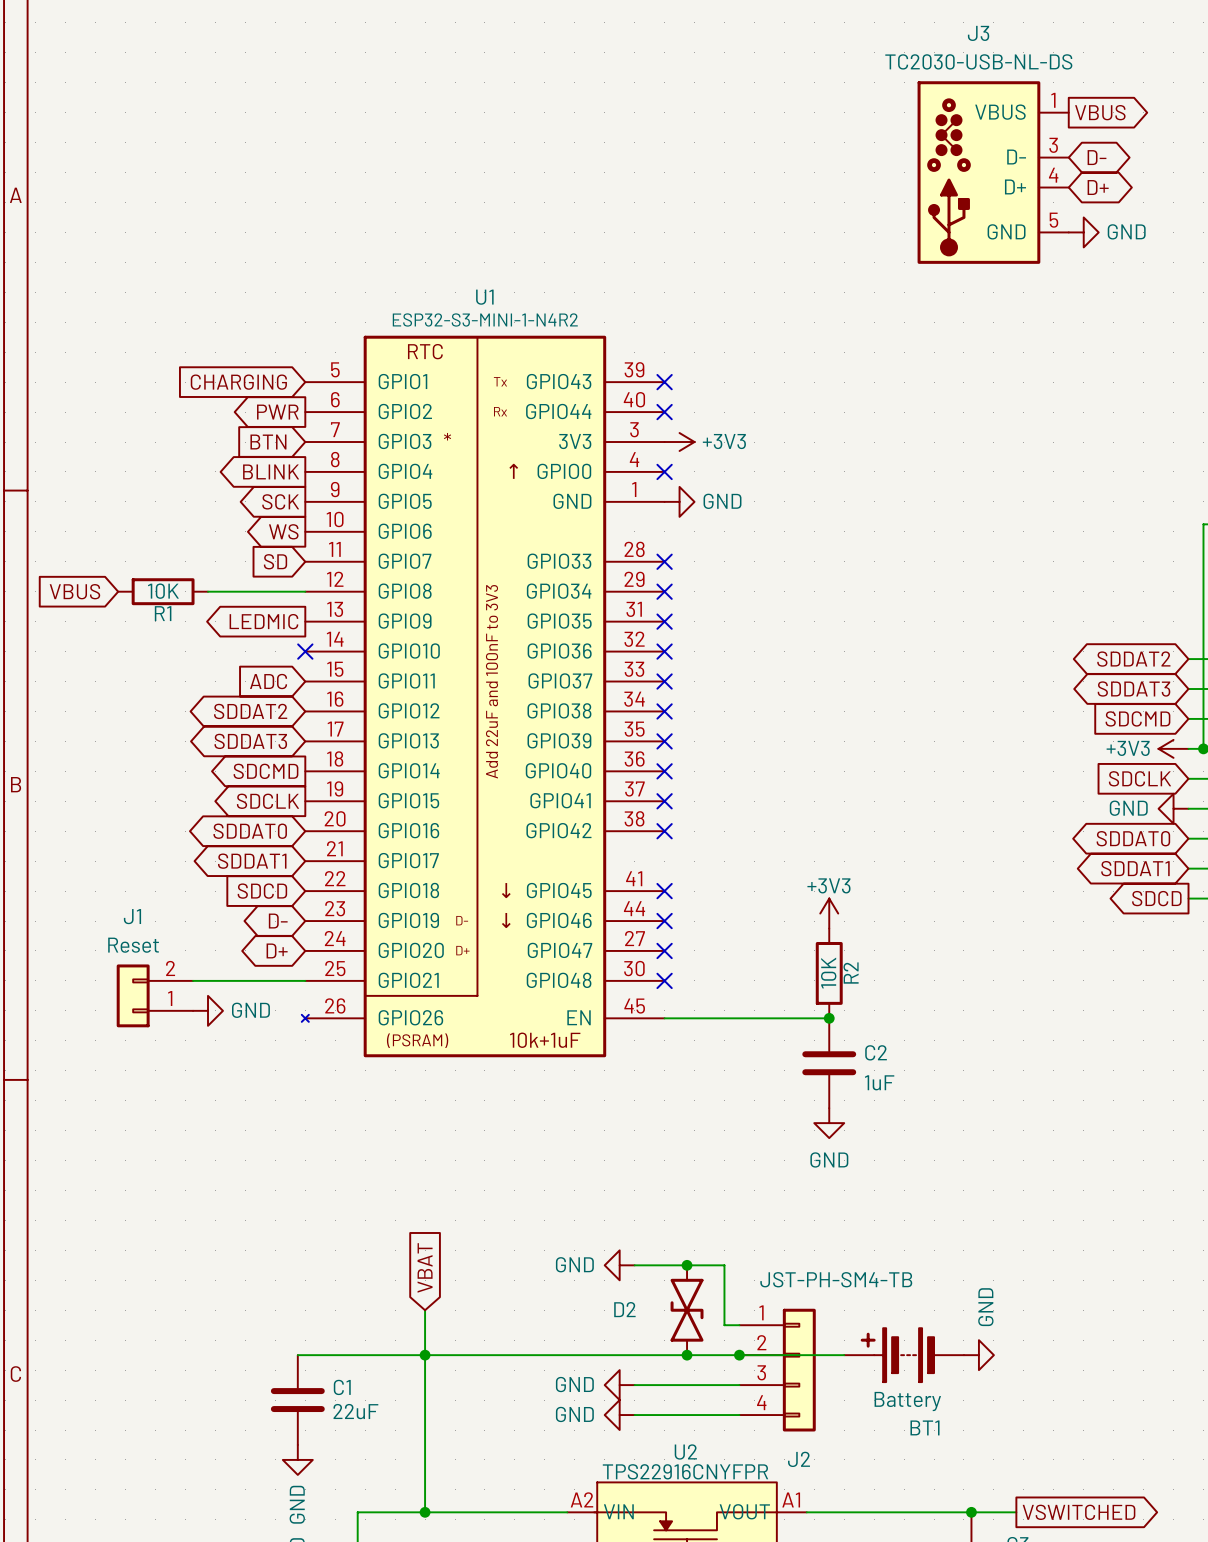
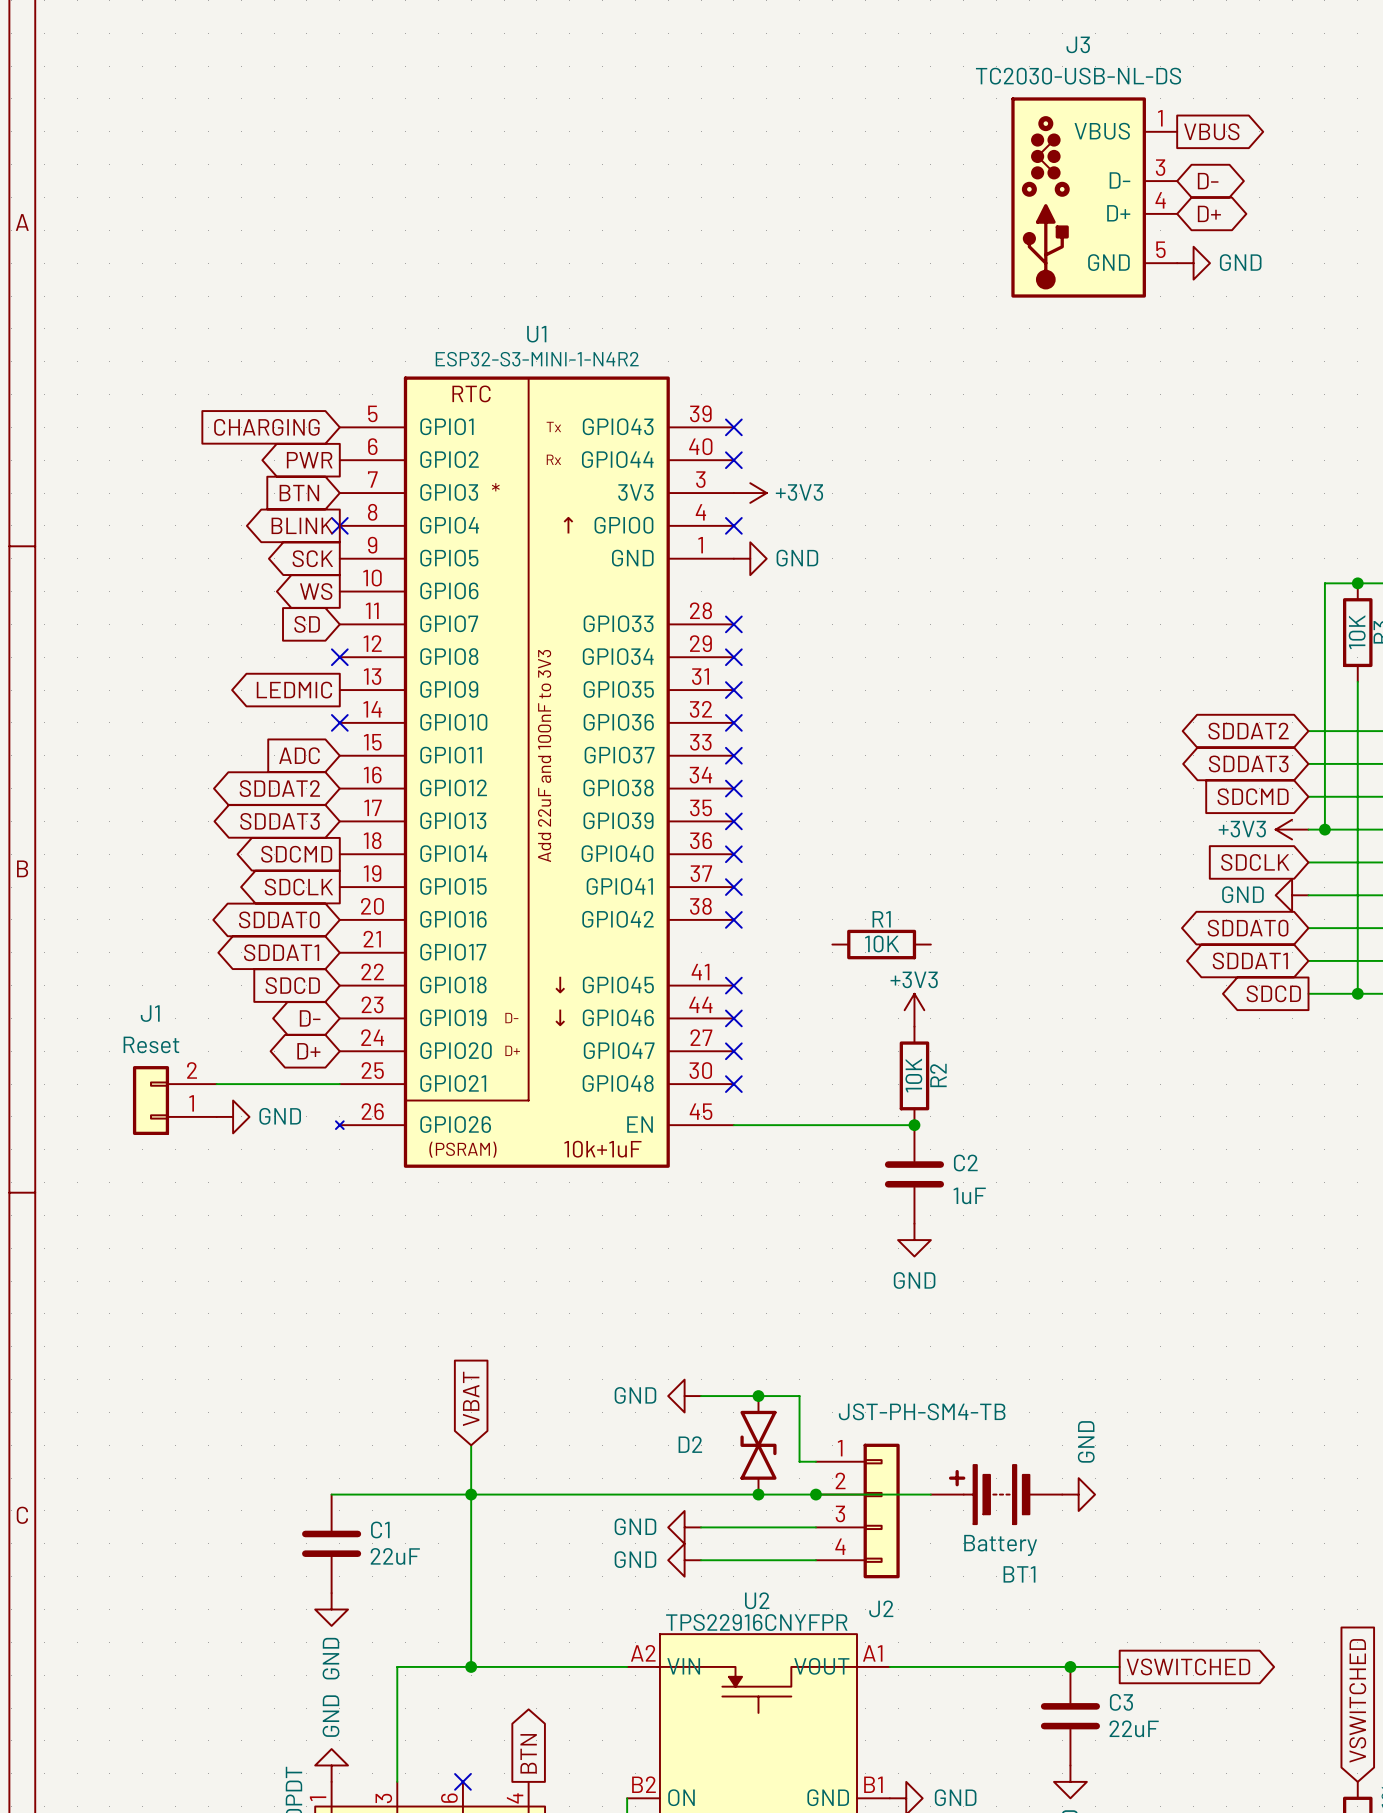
no-connect mark: none -> (339, 525)
global label: VBUS (74, 591) -> none
R1 position: (163, 591) -> (881, 944)
wire: (208, 591) (305, 591) -> none
no-connect mark: none -> (339, 657)
R1 name position: R1 (163, 613) -> R1 (881, 919)

